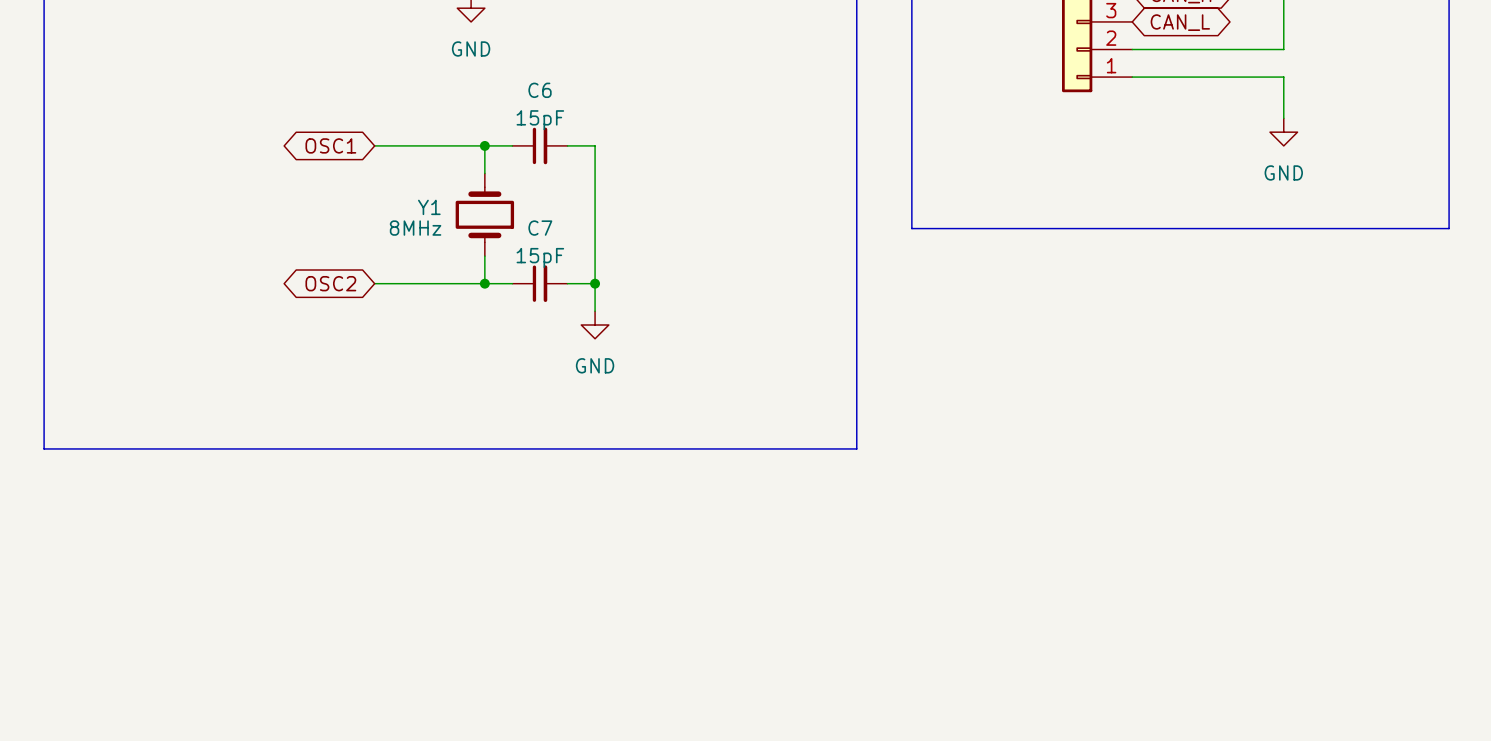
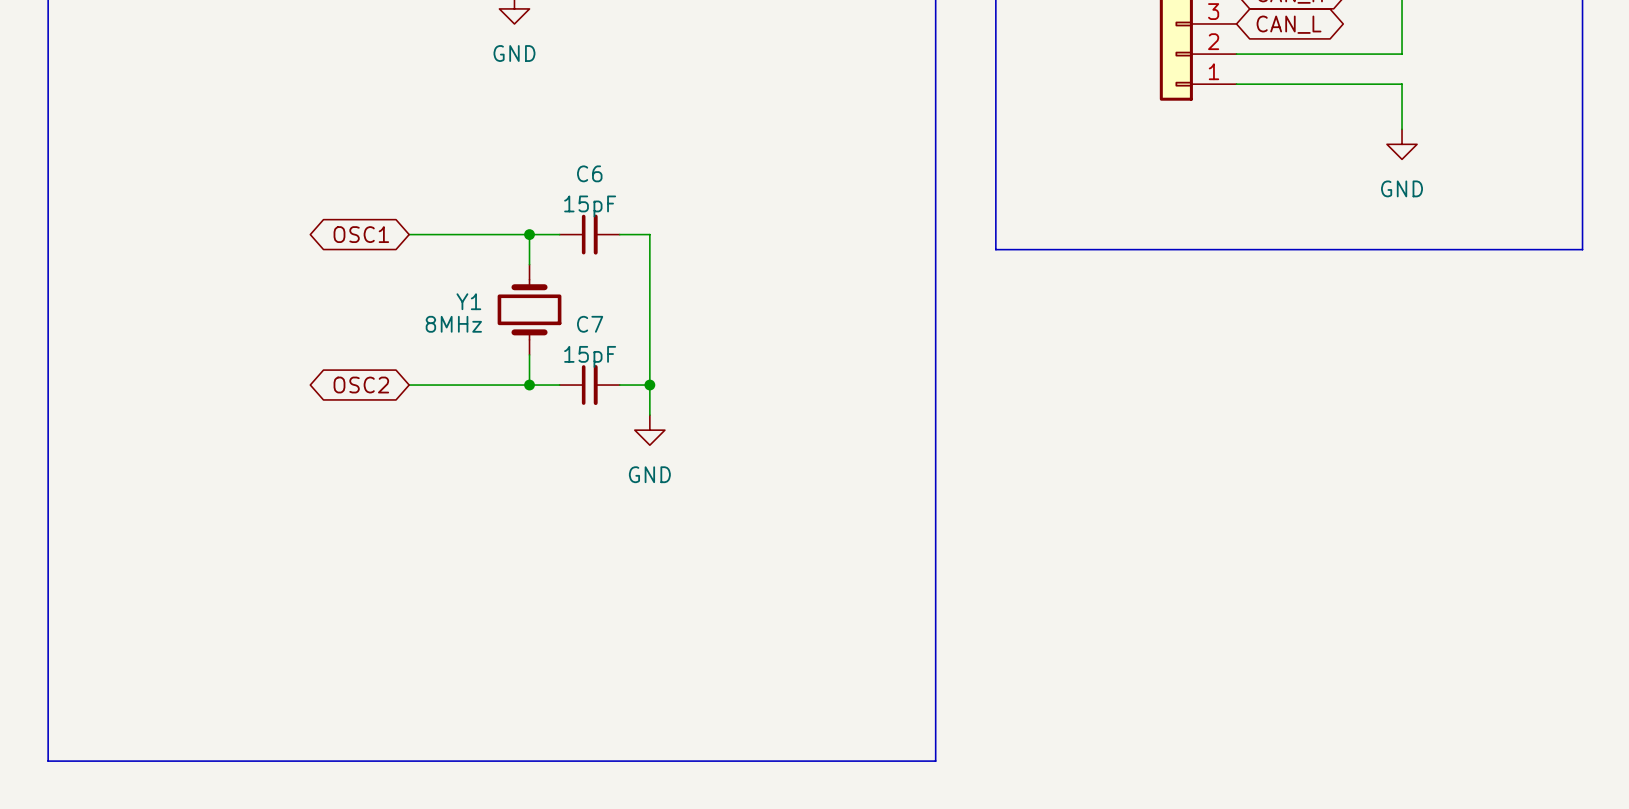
global label position: OSC1 (330, 145) -> OSC1 (361, 234)
wire: (374, 145) (512, 145) -> (409, 234) (559, 234)
wire: (484, 145) (484, 173) -> (529, 234) (529, 264)
junction: (484, 145) -> none
C6 position: (539, 145) -> (589, 234)
wire: (567, 145) (595, 145) (595, 214) -> (619, 234) (649, 234)
junction: none -> (529, 234)
Y1 position: (484, 214) -> (529, 309)
wire: (484, 256) (484, 283) -> (529, 354) (529, 385)
global label position: OSC2 (330, 283) -> OSC2 (361, 385)
wire: (374, 283) (512, 283) -> (409, 385) (559, 385)
junction: (484, 283) -> none
C7 position: (539, 283) -> (589, 385)
wire: (567, 283) (595, 283) -> (619, 385) (649, 385)
junction: (595, 283) -> none
wire: none -> (649, 339) (649, 415)
power symbol position: GND (595, 325) -> GND (649, 430)
junction: none -> (529, 385)
junction: none -> (649, 385)
line: (44, 448) (856, 448) -> (48, 490) (48, 761) (935, 761) (935, 490)

